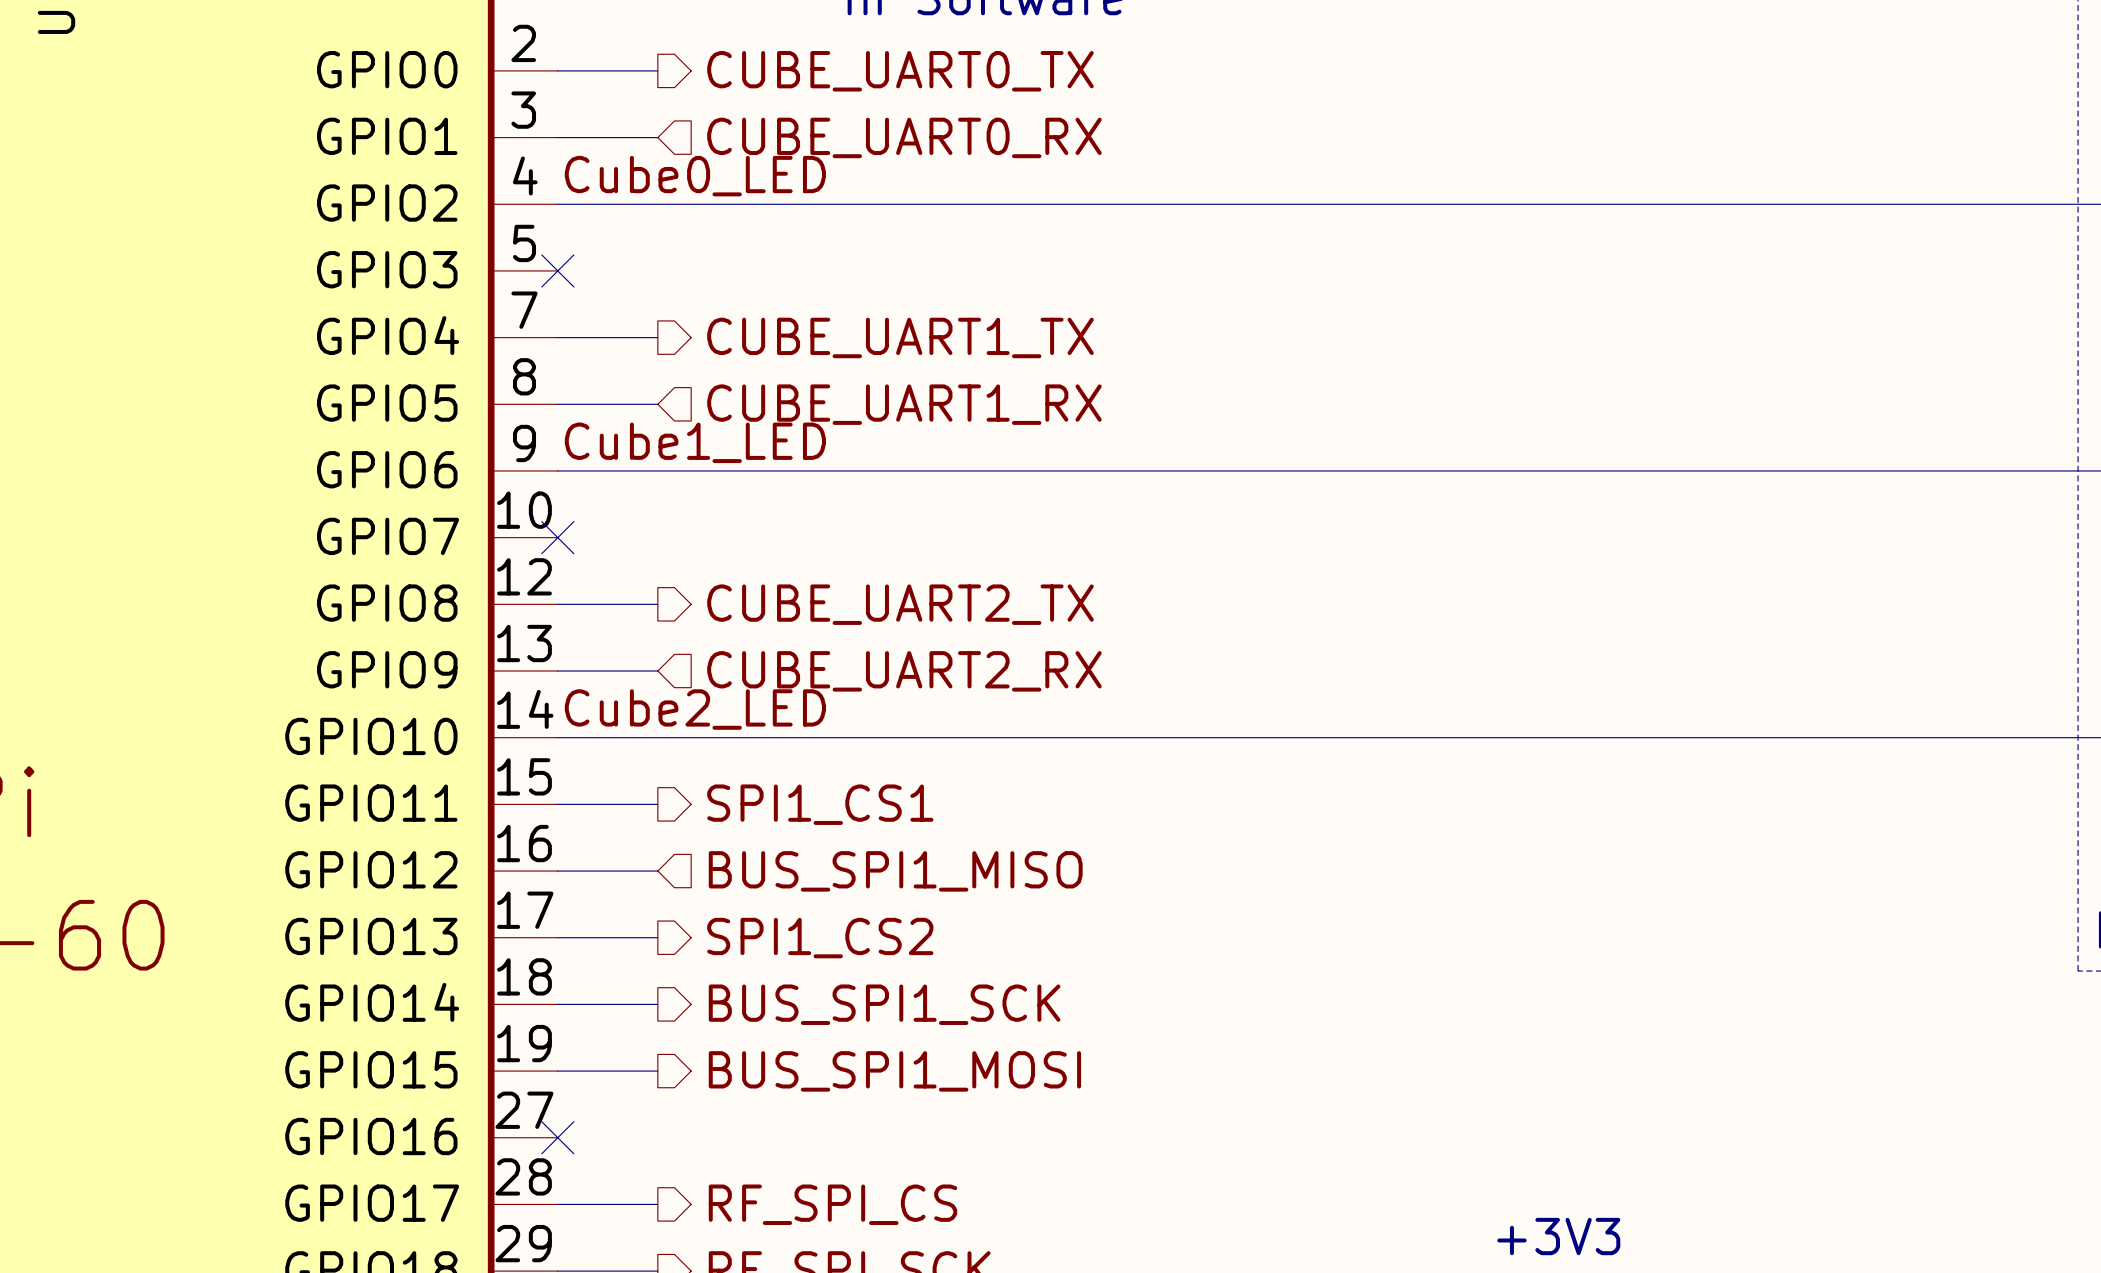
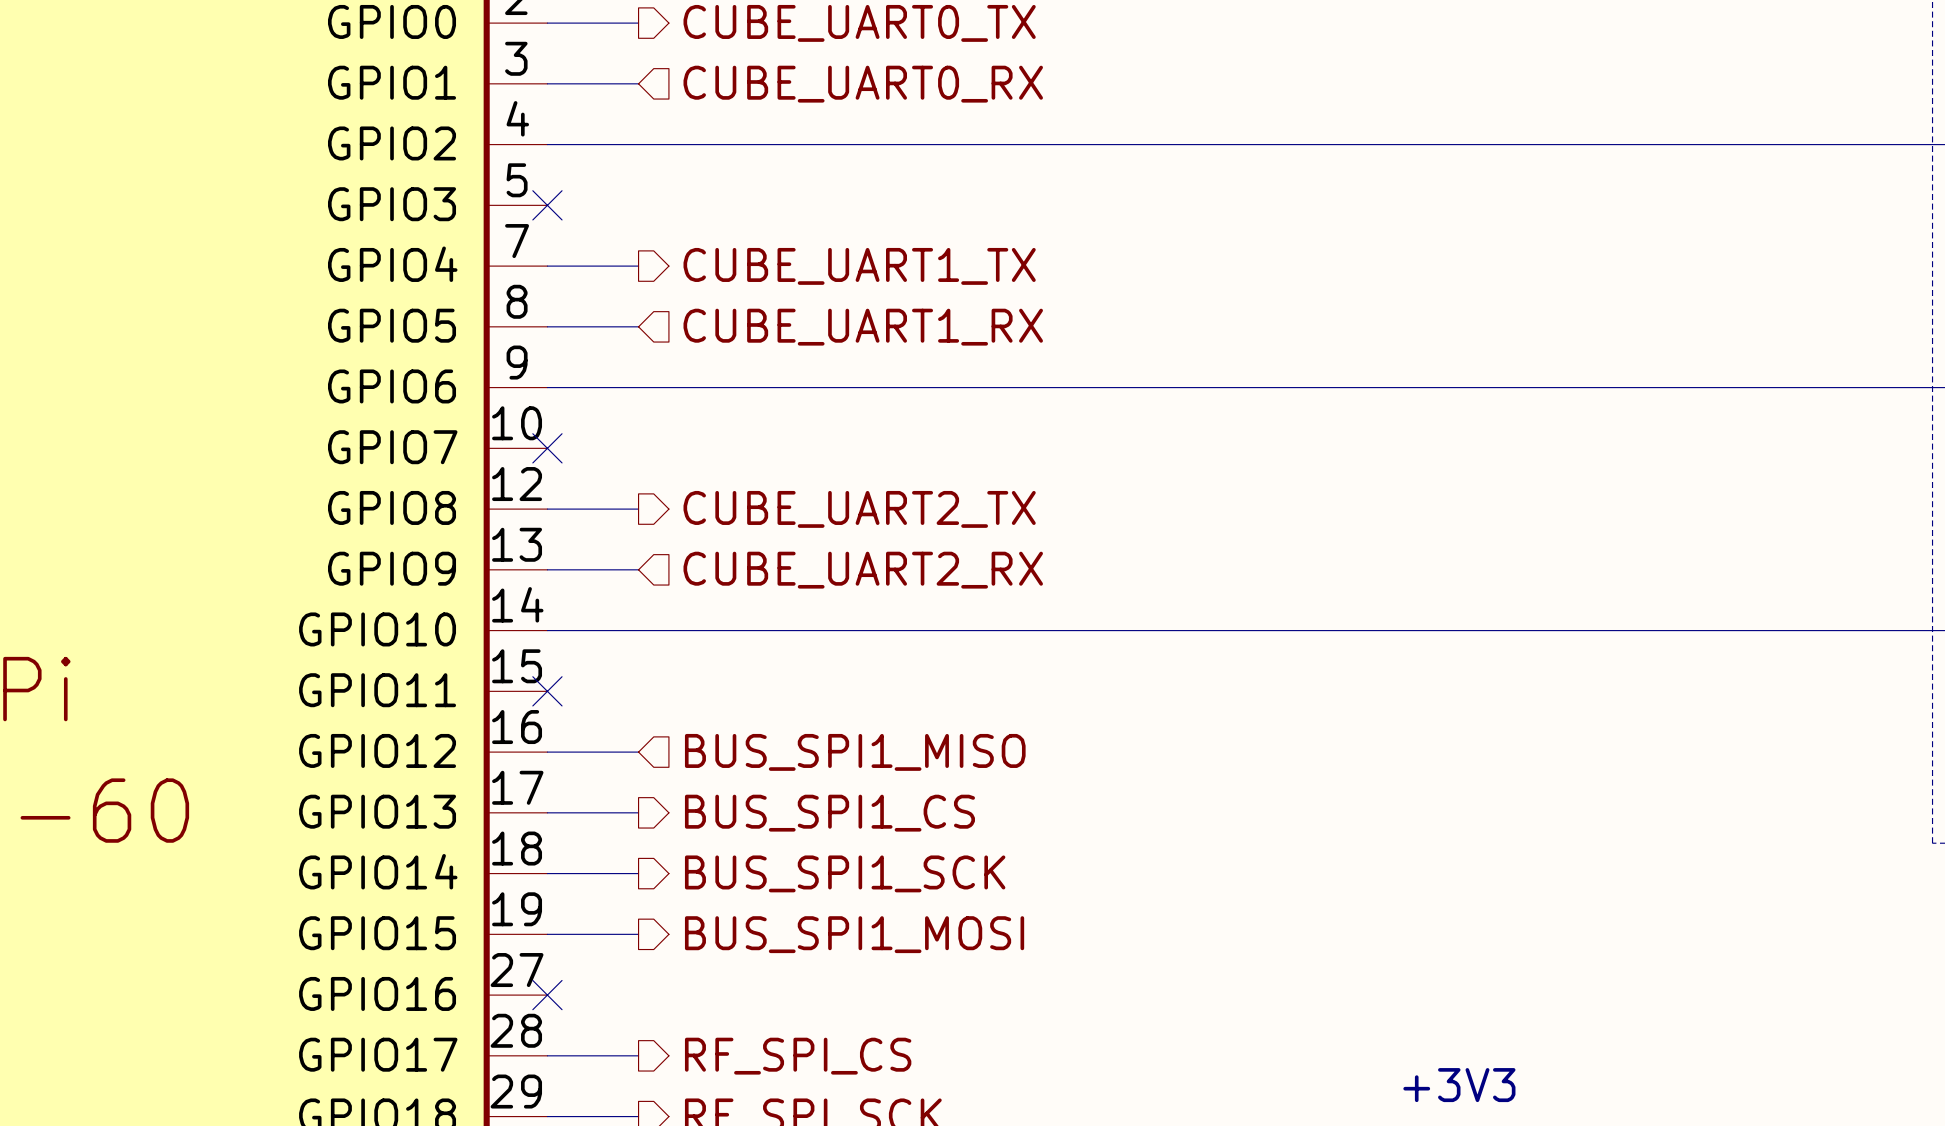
label: Cube0_LED (695, 176) -> none
label: Cube1_LED (695, 442) -> none
label: Cube2_LED (695, 709) -> none
wire: (557, 804) (657, 804) -> none
no-connect mark: none -> (547, 691)
hierarchical label: SPI1_CS1 (820, 804) -> none
hierarchical label: SPI1_CS2 (820, 938) -> BUS_SPI1_CS (829, 813)

